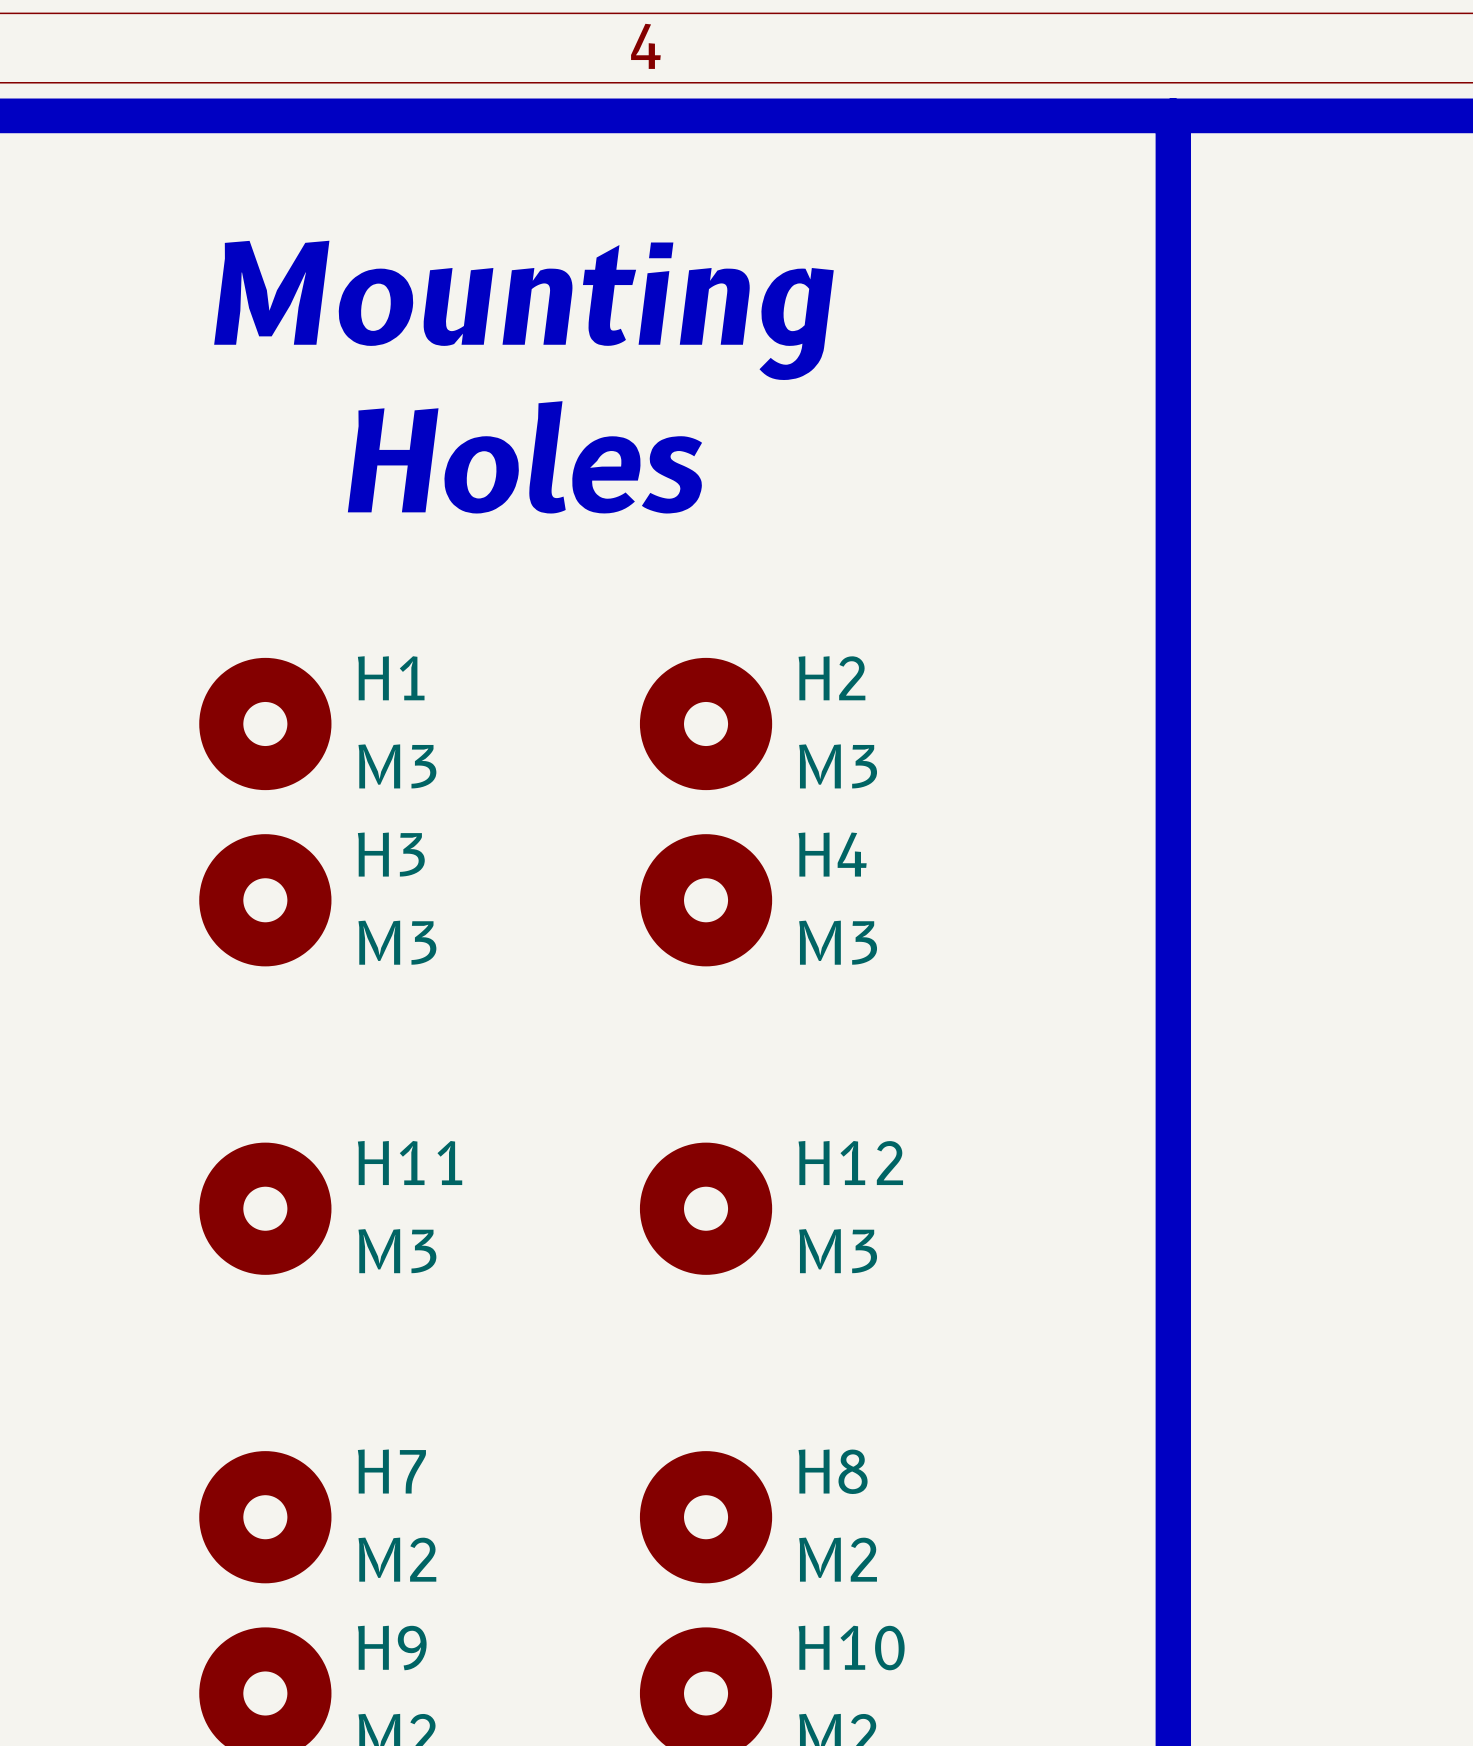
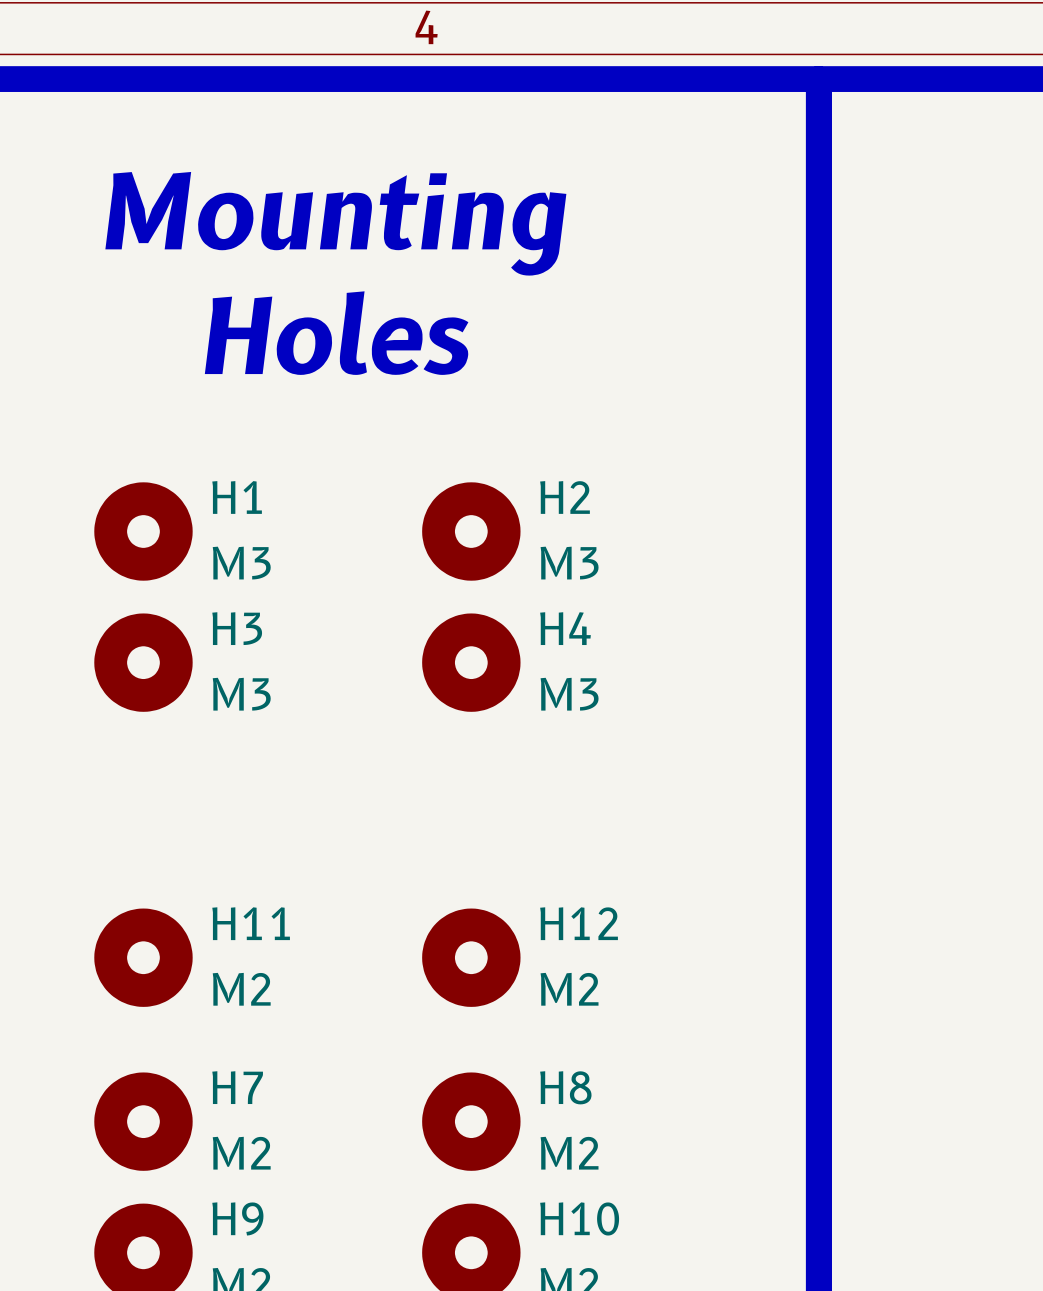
H11 position: (265, 1208) -> (143, 957)
H12 position: (706, 1208) -> (471, 957)
H11 value: M3 (397, 1251) -> M2 (241, 989)
H12 value: M3 (838, 1251) -> M2 (569, 989)

